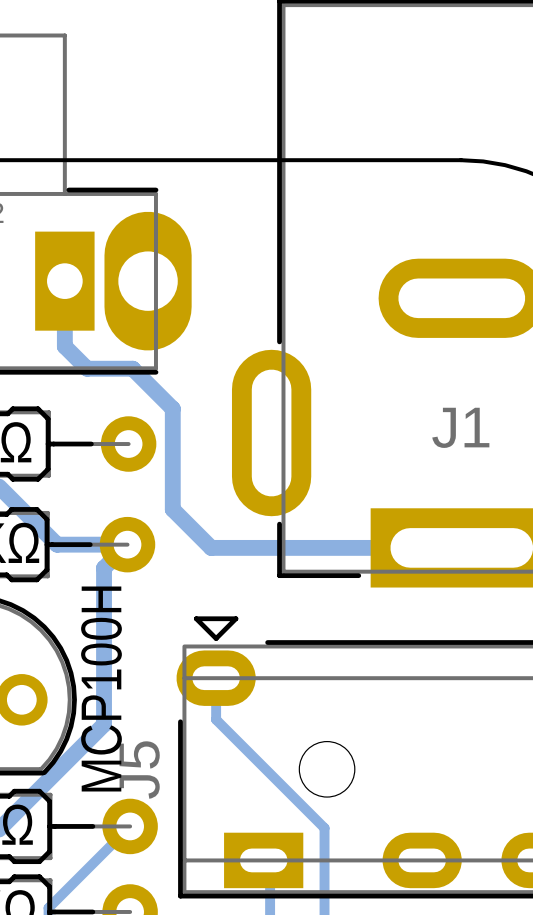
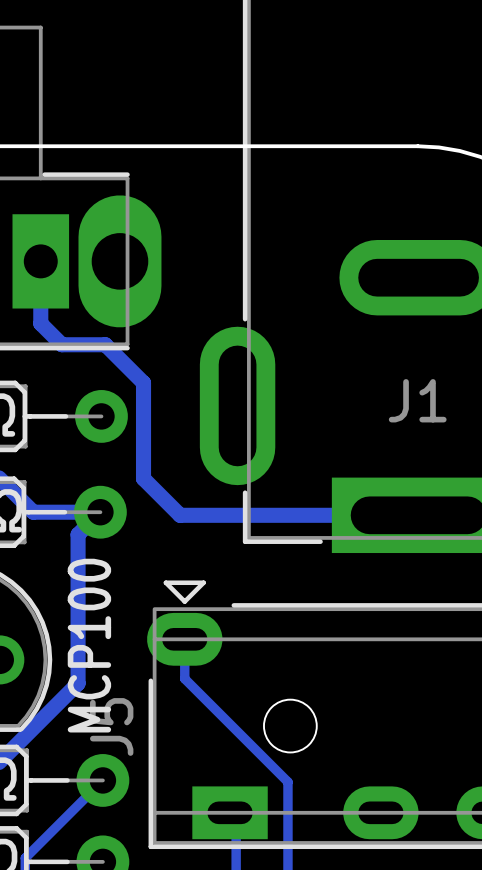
part value: MCP100H (101, 689) -> MCP100 (89, 645)

